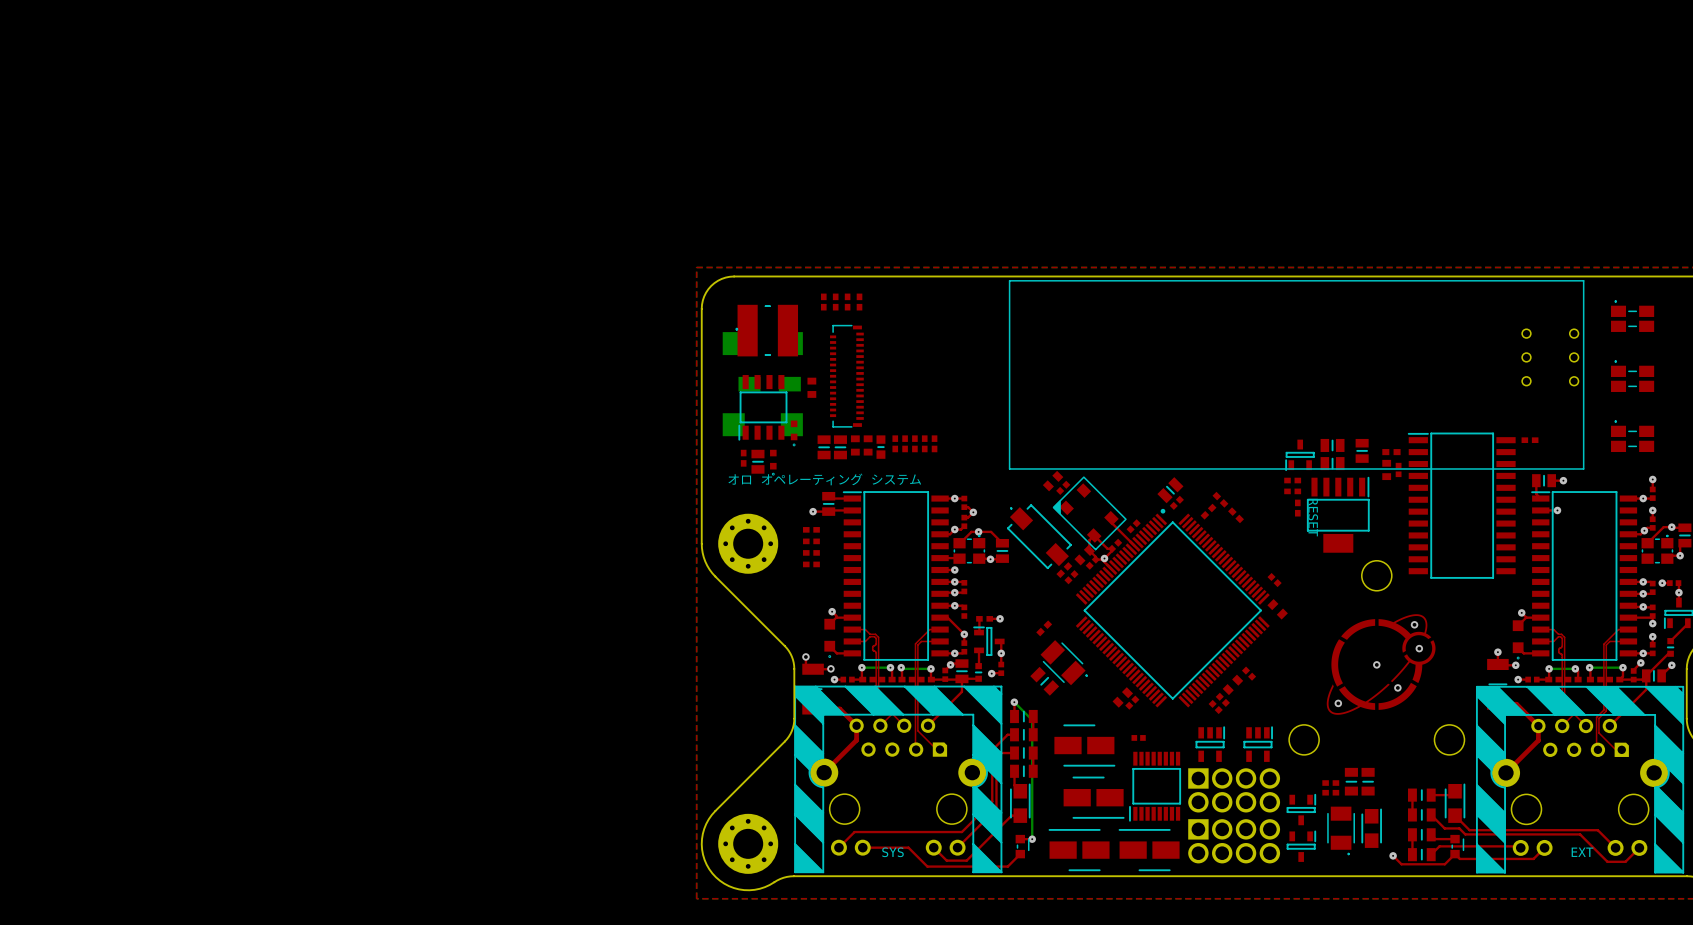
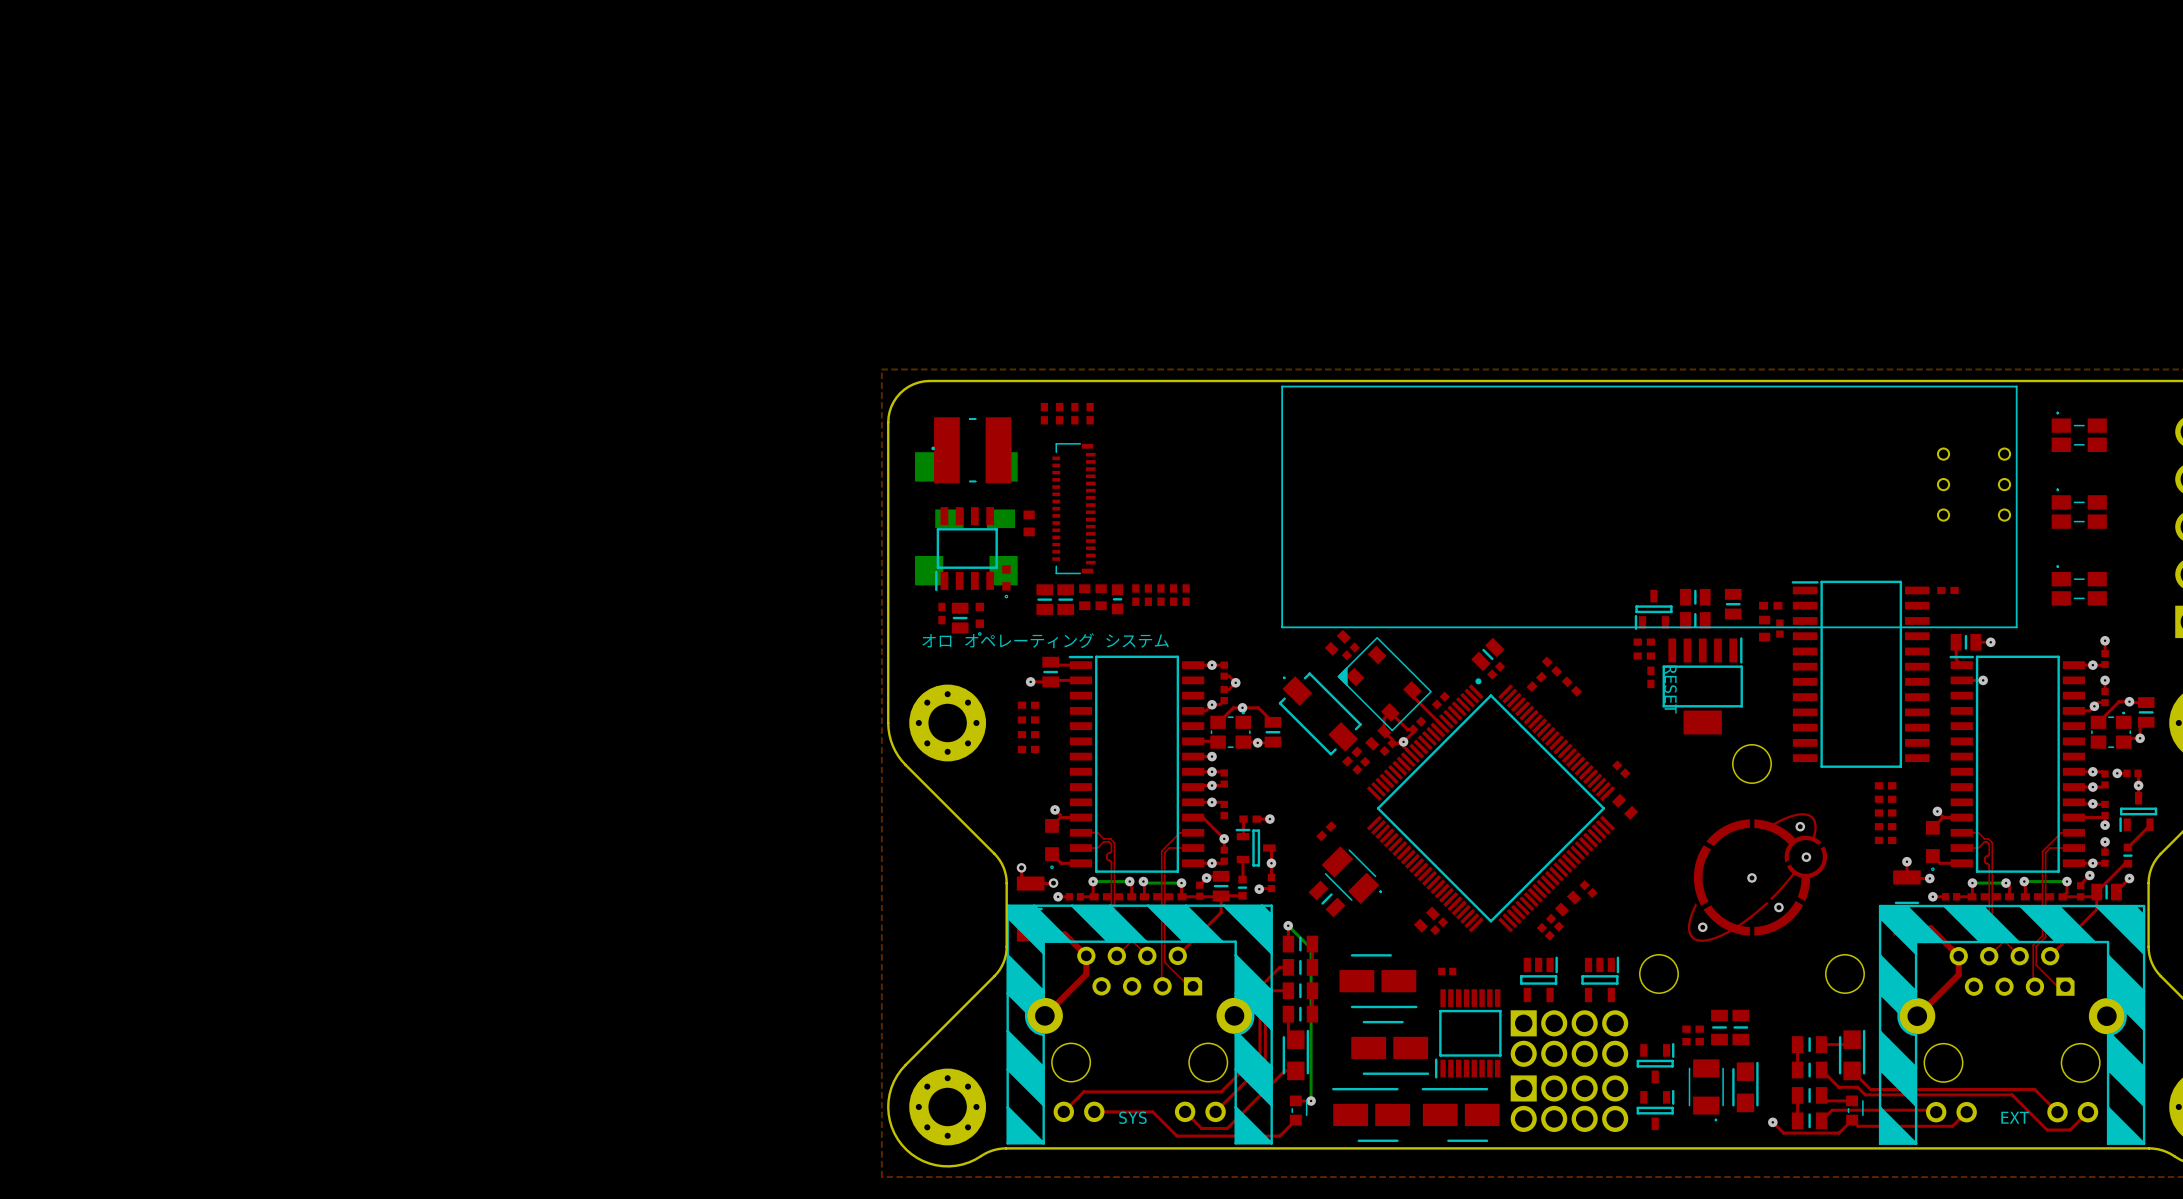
part: none -> (1885, 785)
part: none -> (1885, 799)
part: none -> (1885, 812)
part: none -> (1885, 826)
part: none -> (1885, 840)

